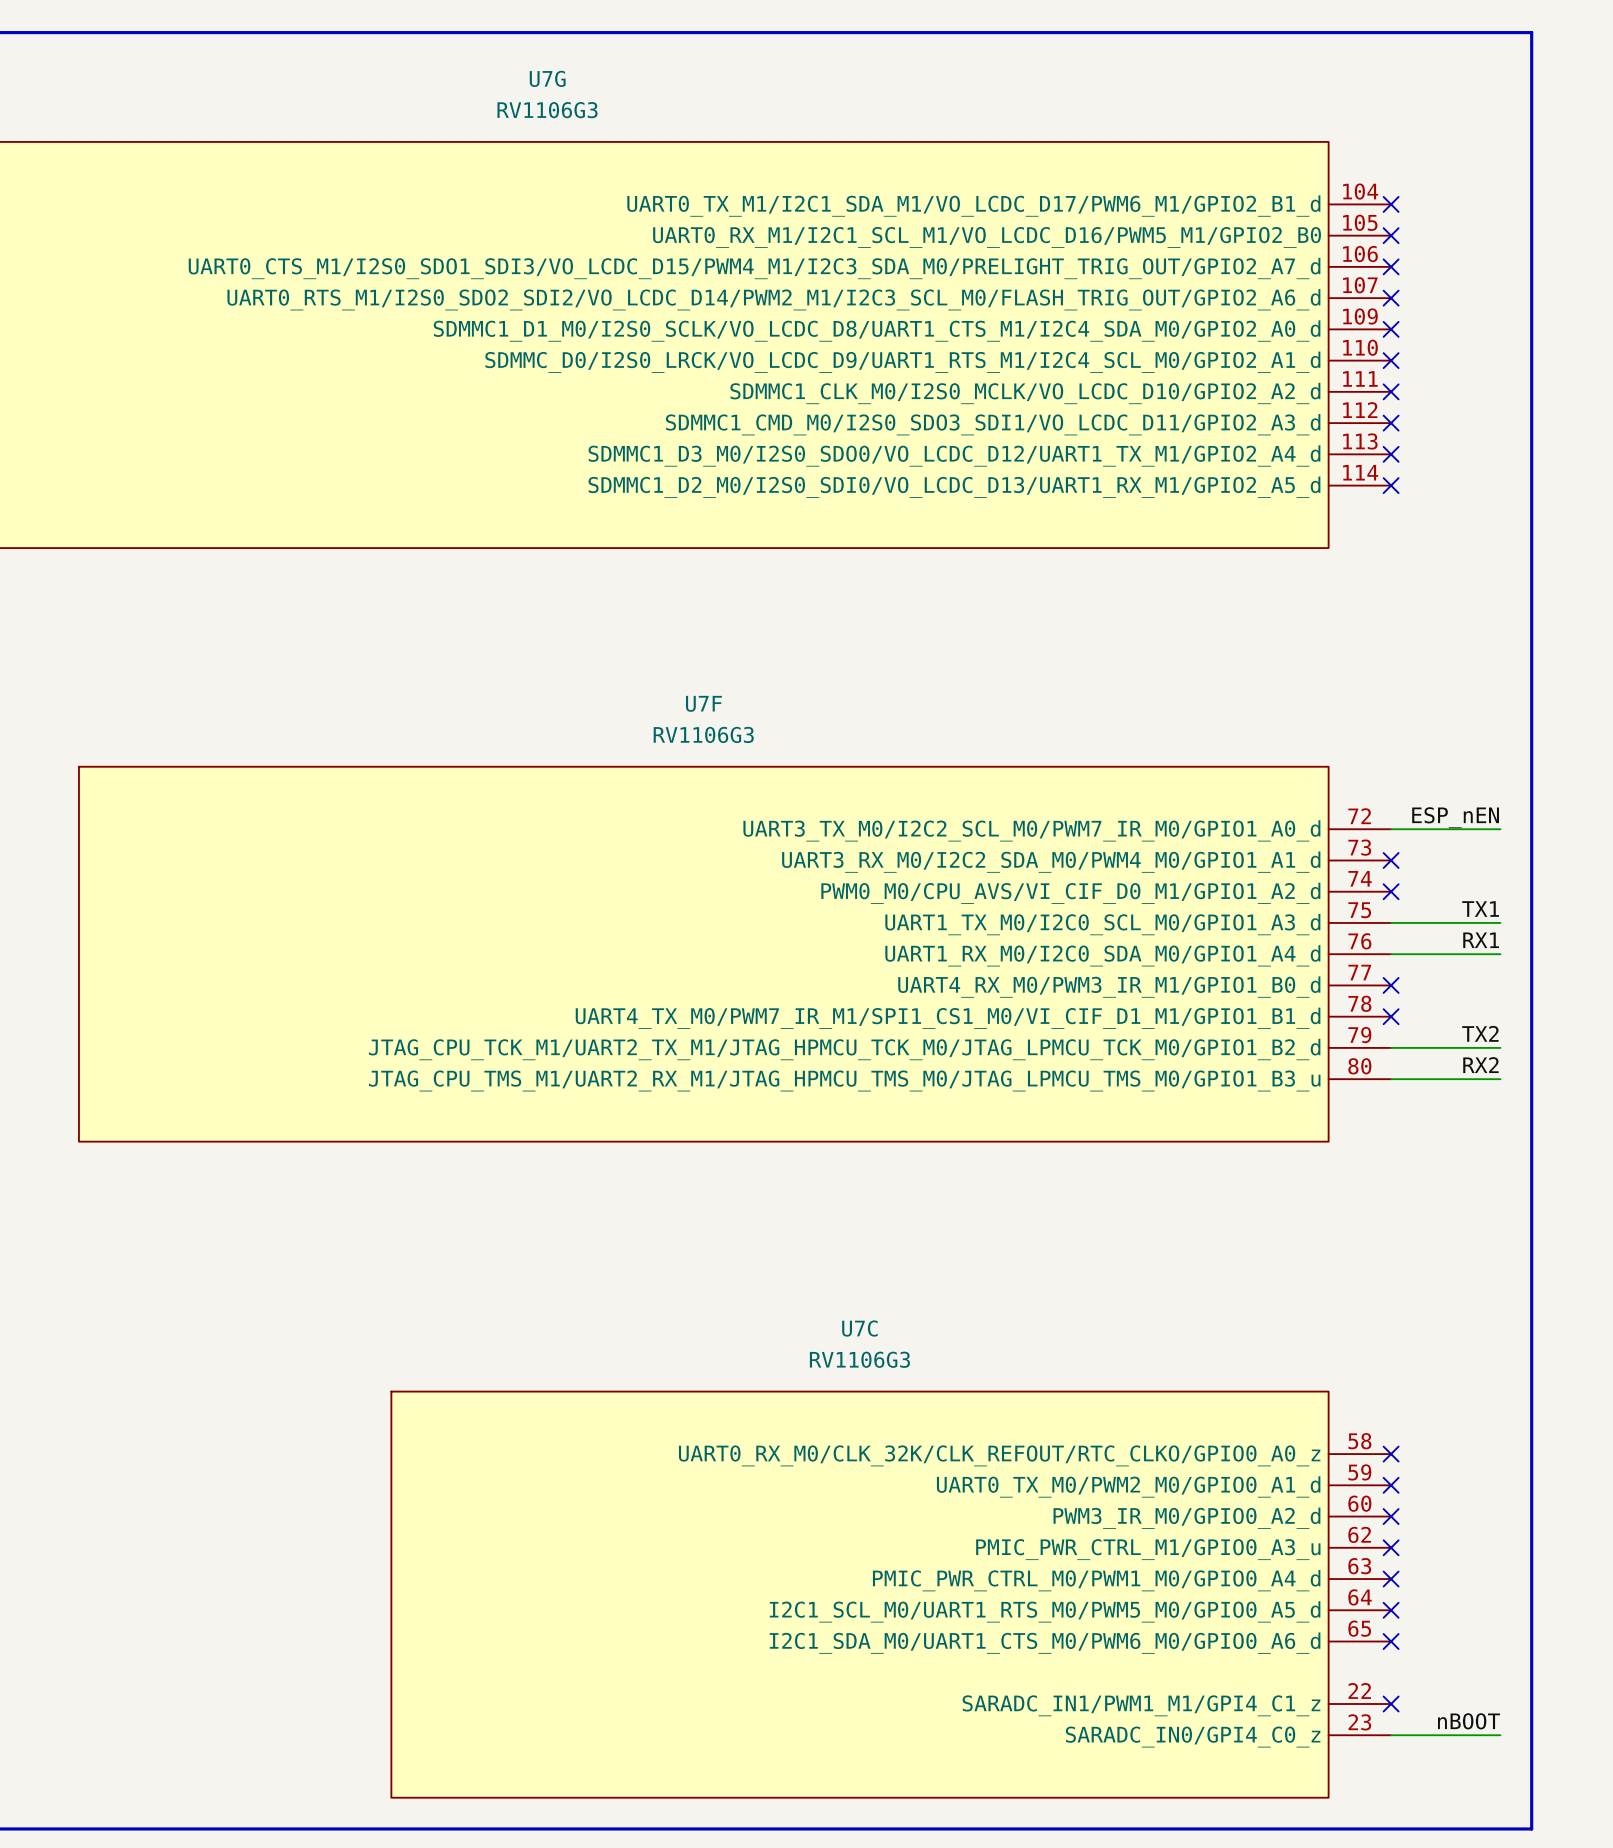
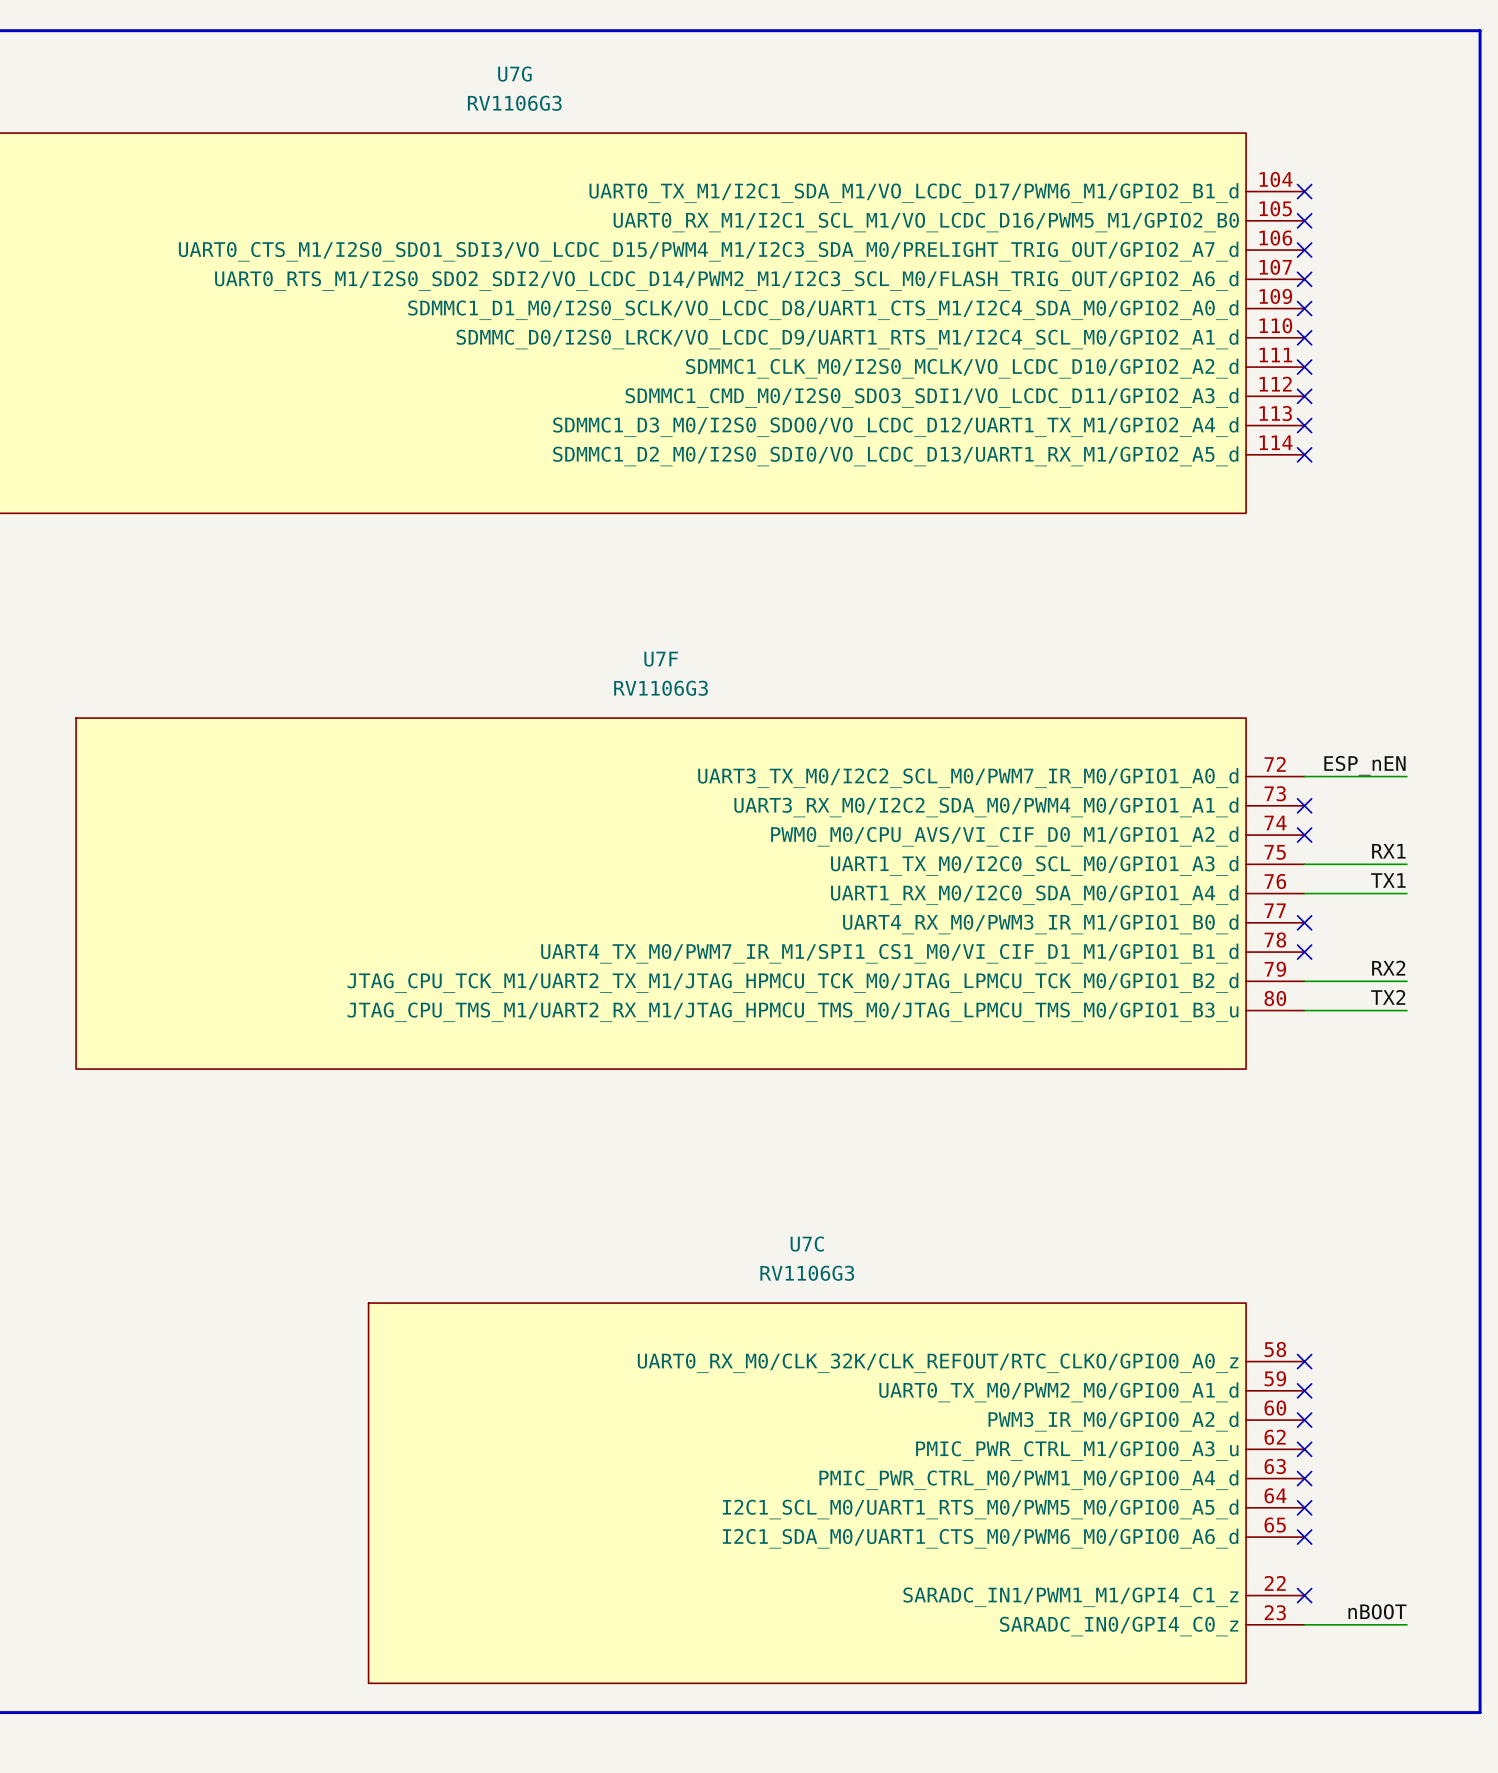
line: (1531, 32) (1531, 1828) -> (1436, 30) (1480, 30) (1480, 1712) (1436, 1712)
label: TX1 (1480, 909) -> RX1 (1388, 851)
label: RX1 (1481, 940) -> TX1 (1388, 880)
label: TX2 (1480, 1033) -> RX2 (1388, 968)
label: RX2 (1480, 1065) -> TX2 (1388, 997)

